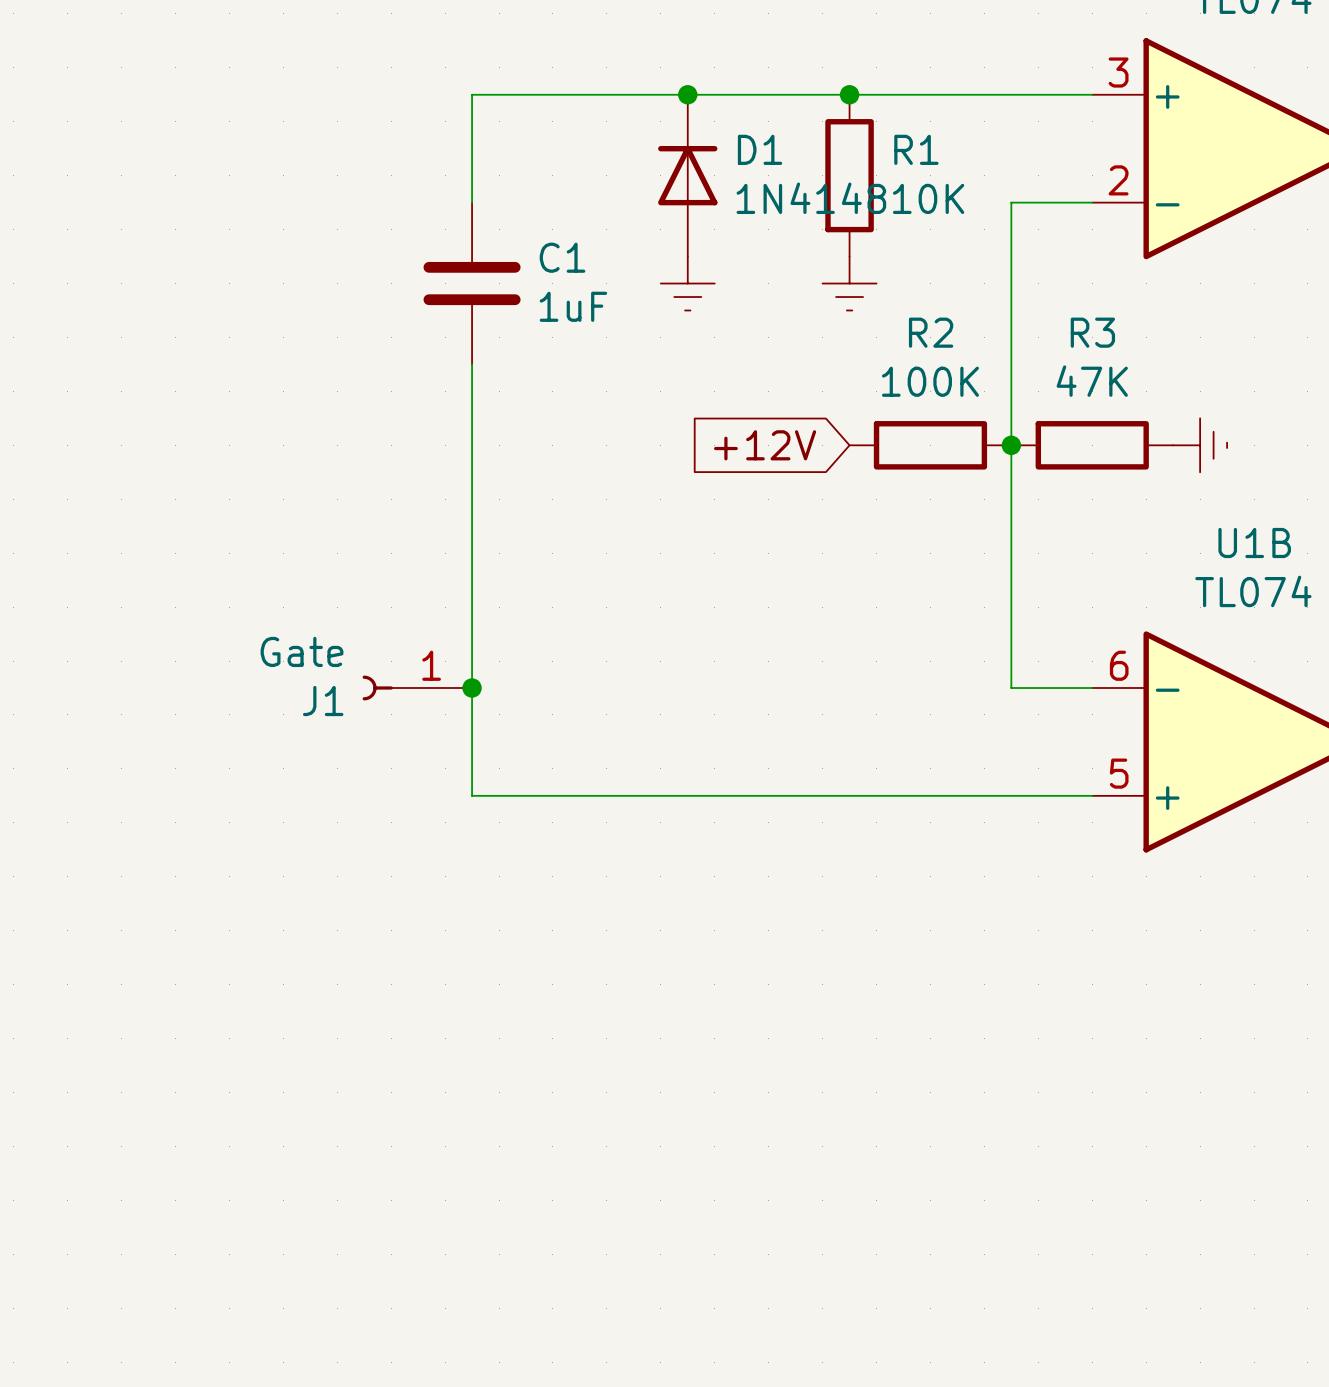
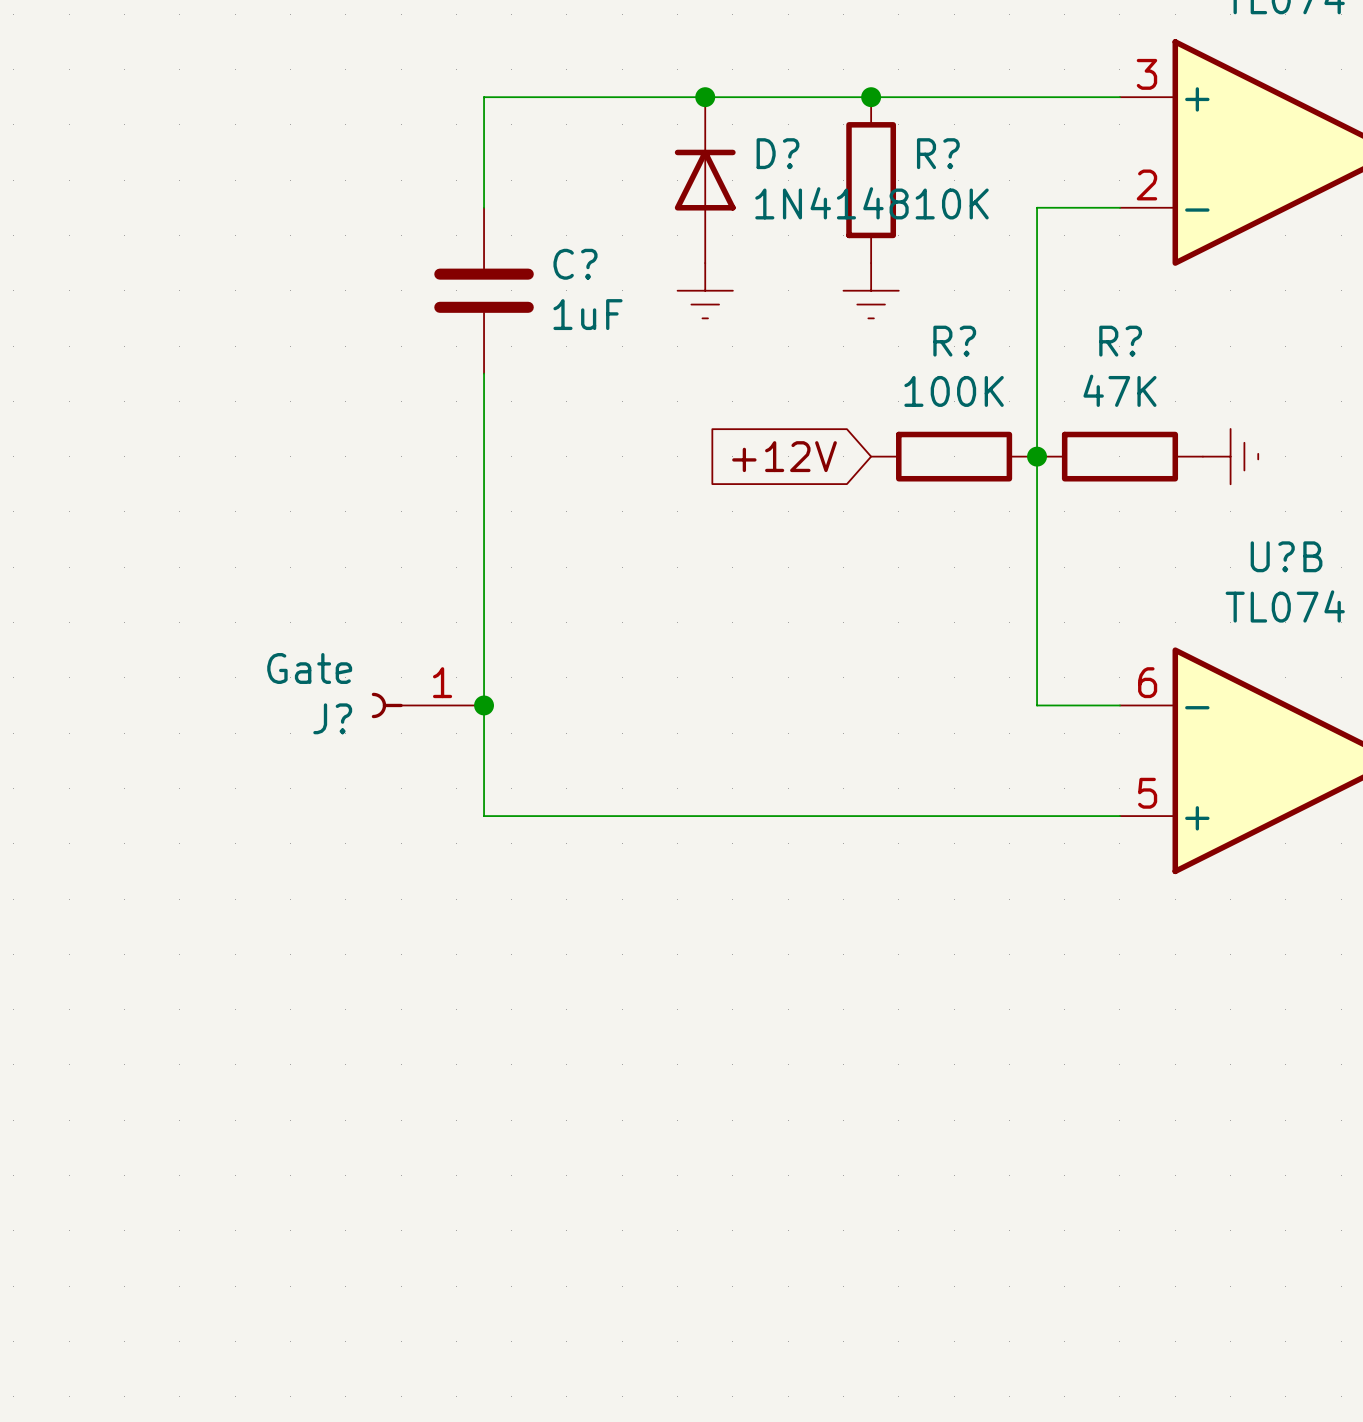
D1 name: D1 (760, 149) -> D? (777, 153)
R1 name: R1 (916, 149) -> R? (938, 153)
C1 name: C1 (562, 257) -> C? (575, 264)
R2 name: R2 (931, 332) -> R? (954, 341)
R3 name: R3 (1092, 332) -> R? (1120, 341)
U1B name: U1B (1254, 543) -> U?B (1286, 556)
J1 name: J1 (323, 701) -> J? (332, 718)

